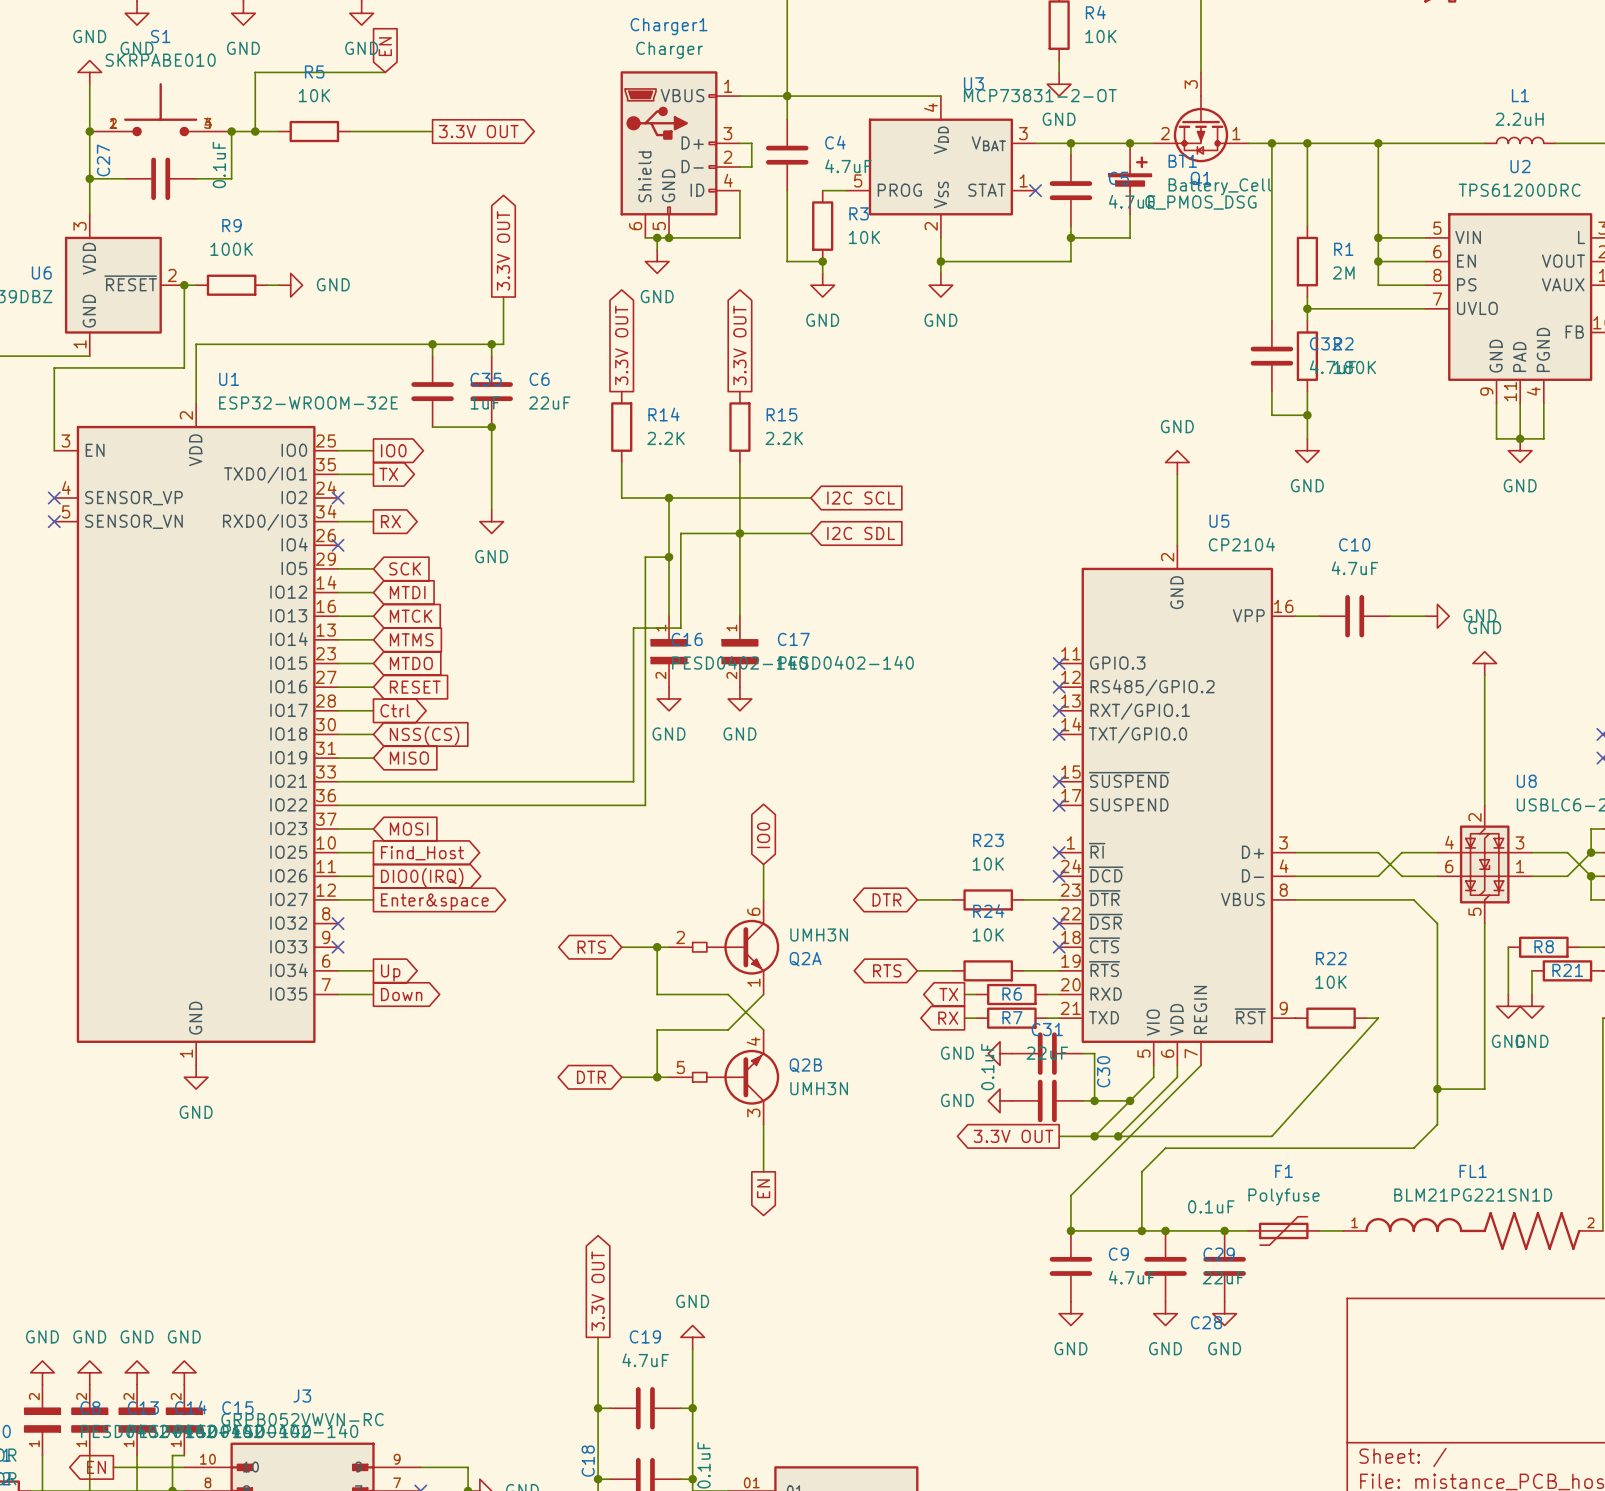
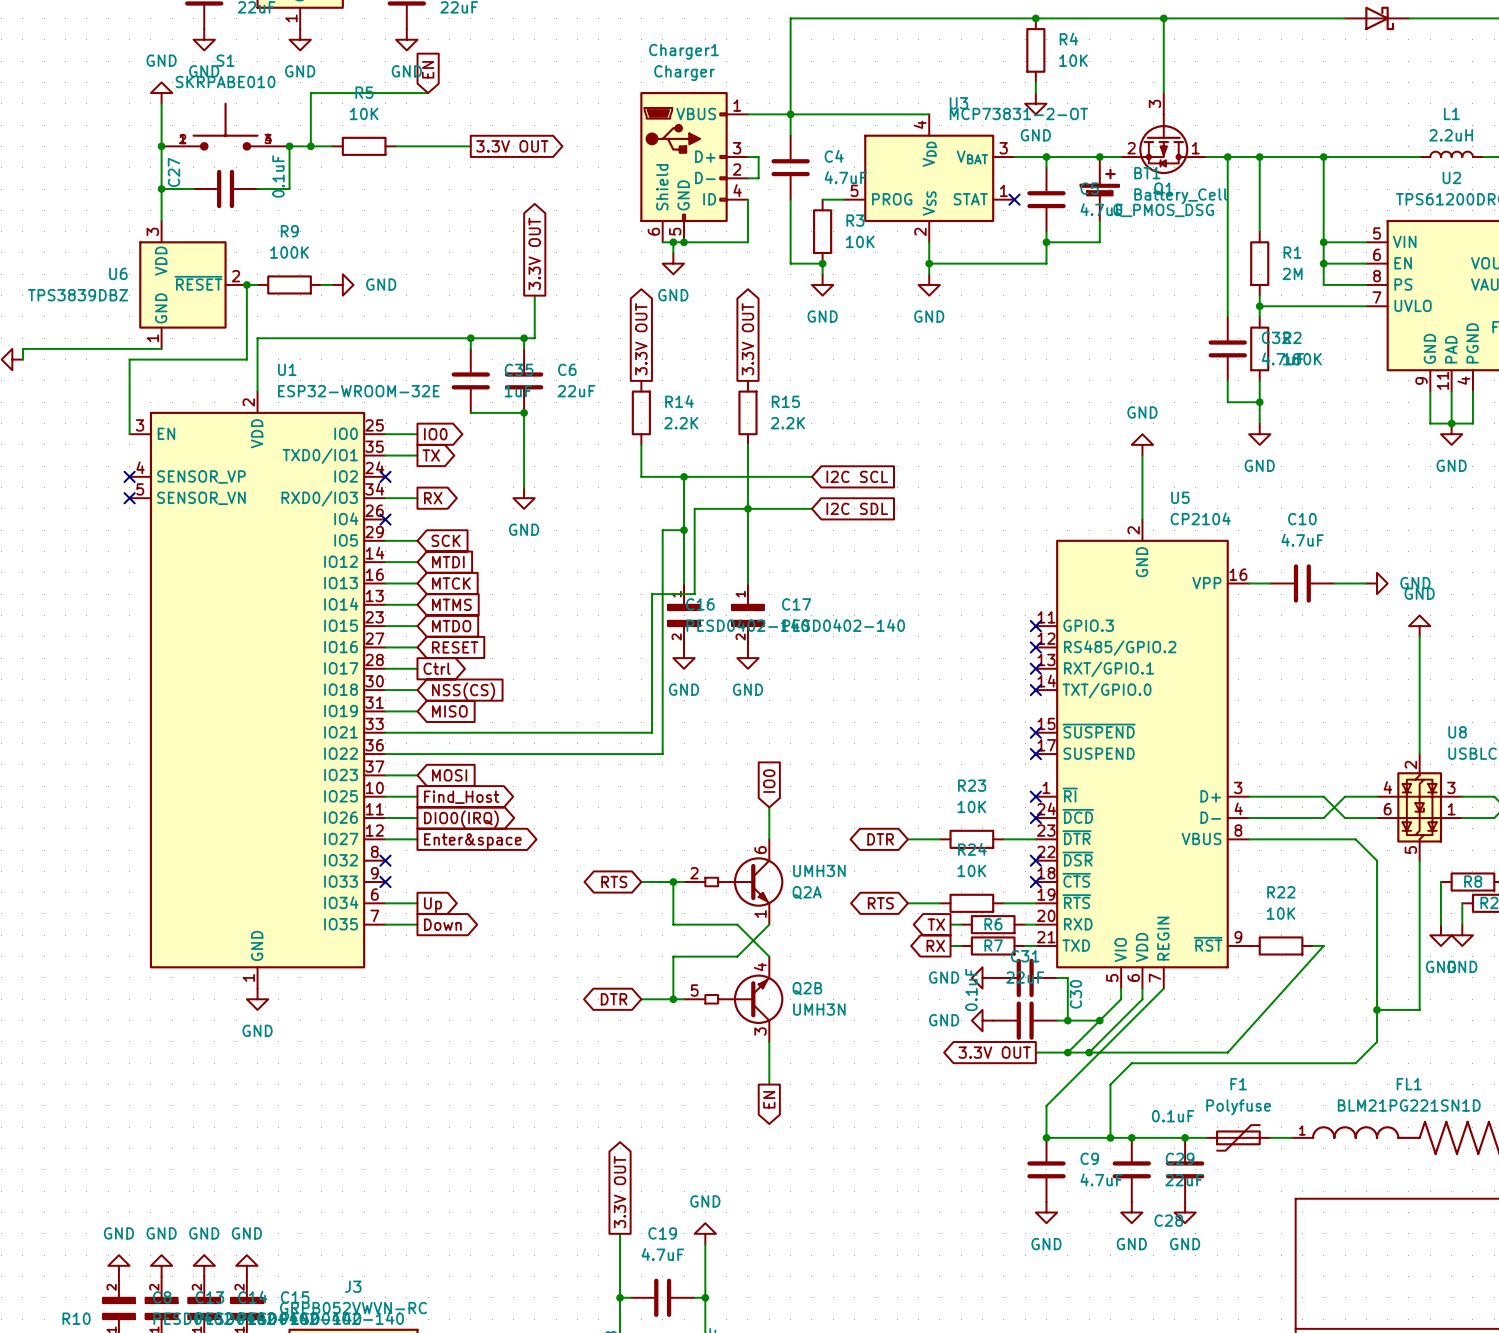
global label shape: bidirectional (763, 835) -> input (769, 781)

